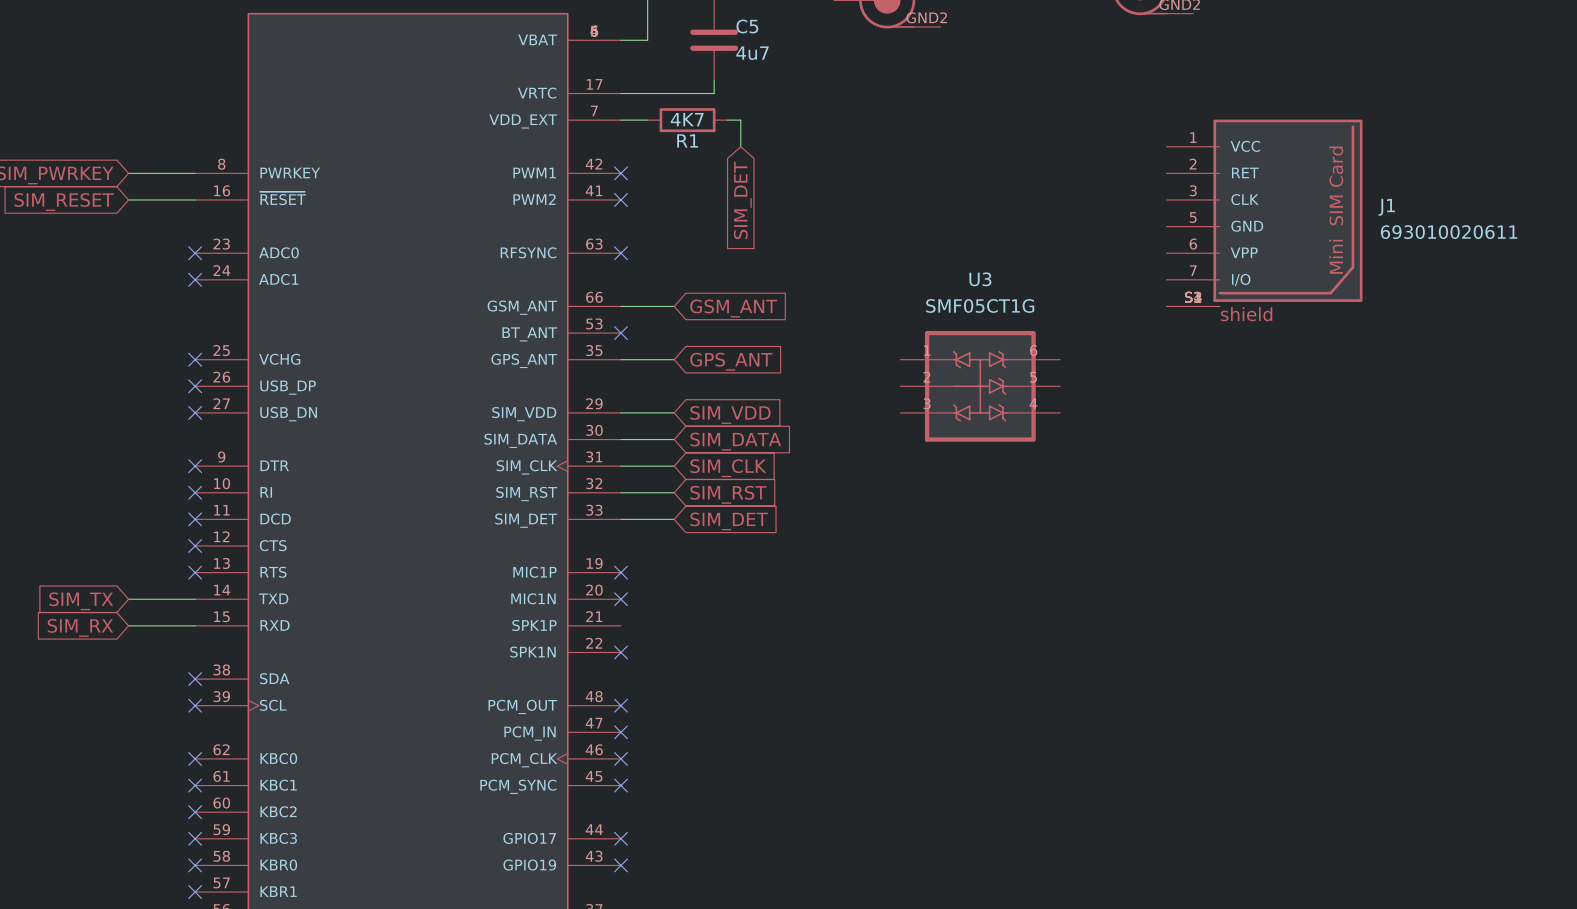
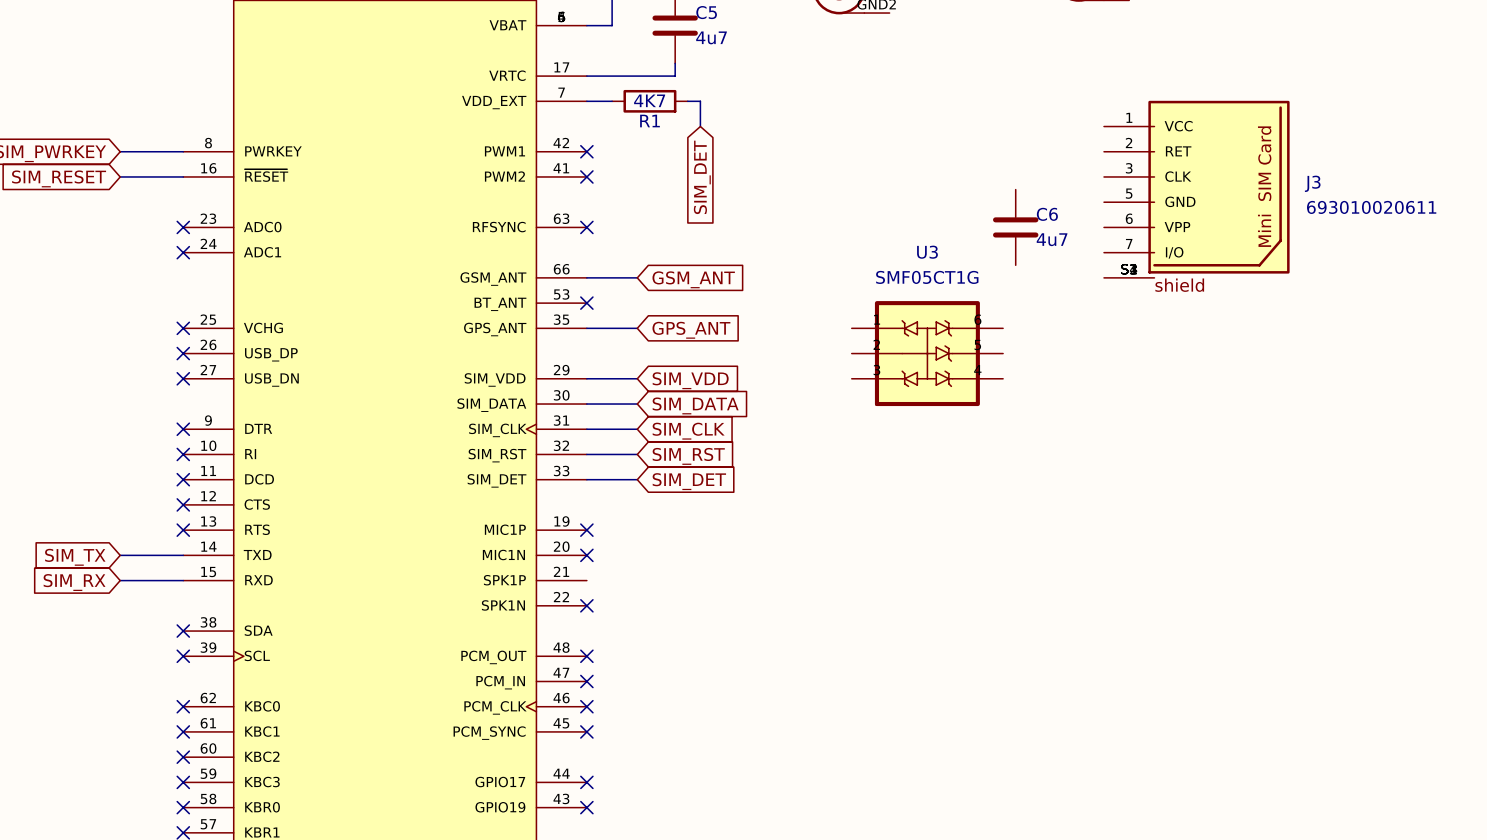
J1 name: J1 (1386, 207) -> J3 (1312, 183)
C6: none -> 4u7 (1015, 227)

